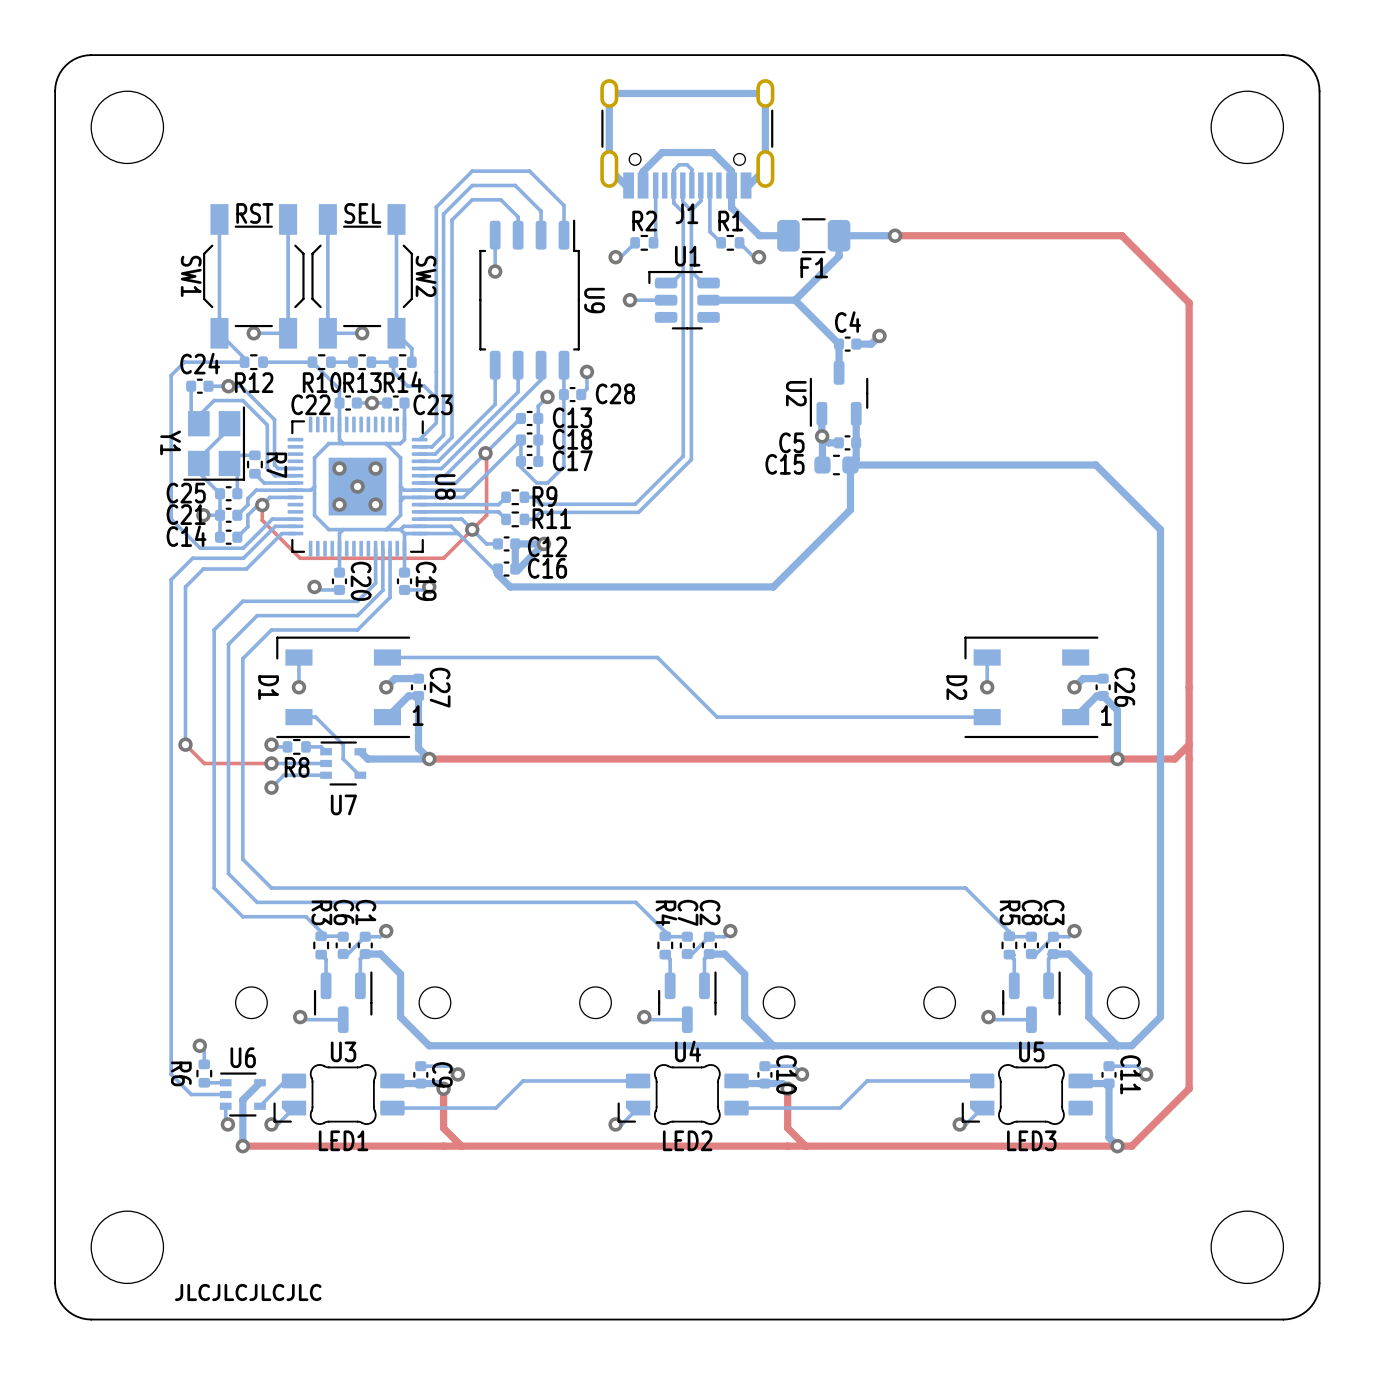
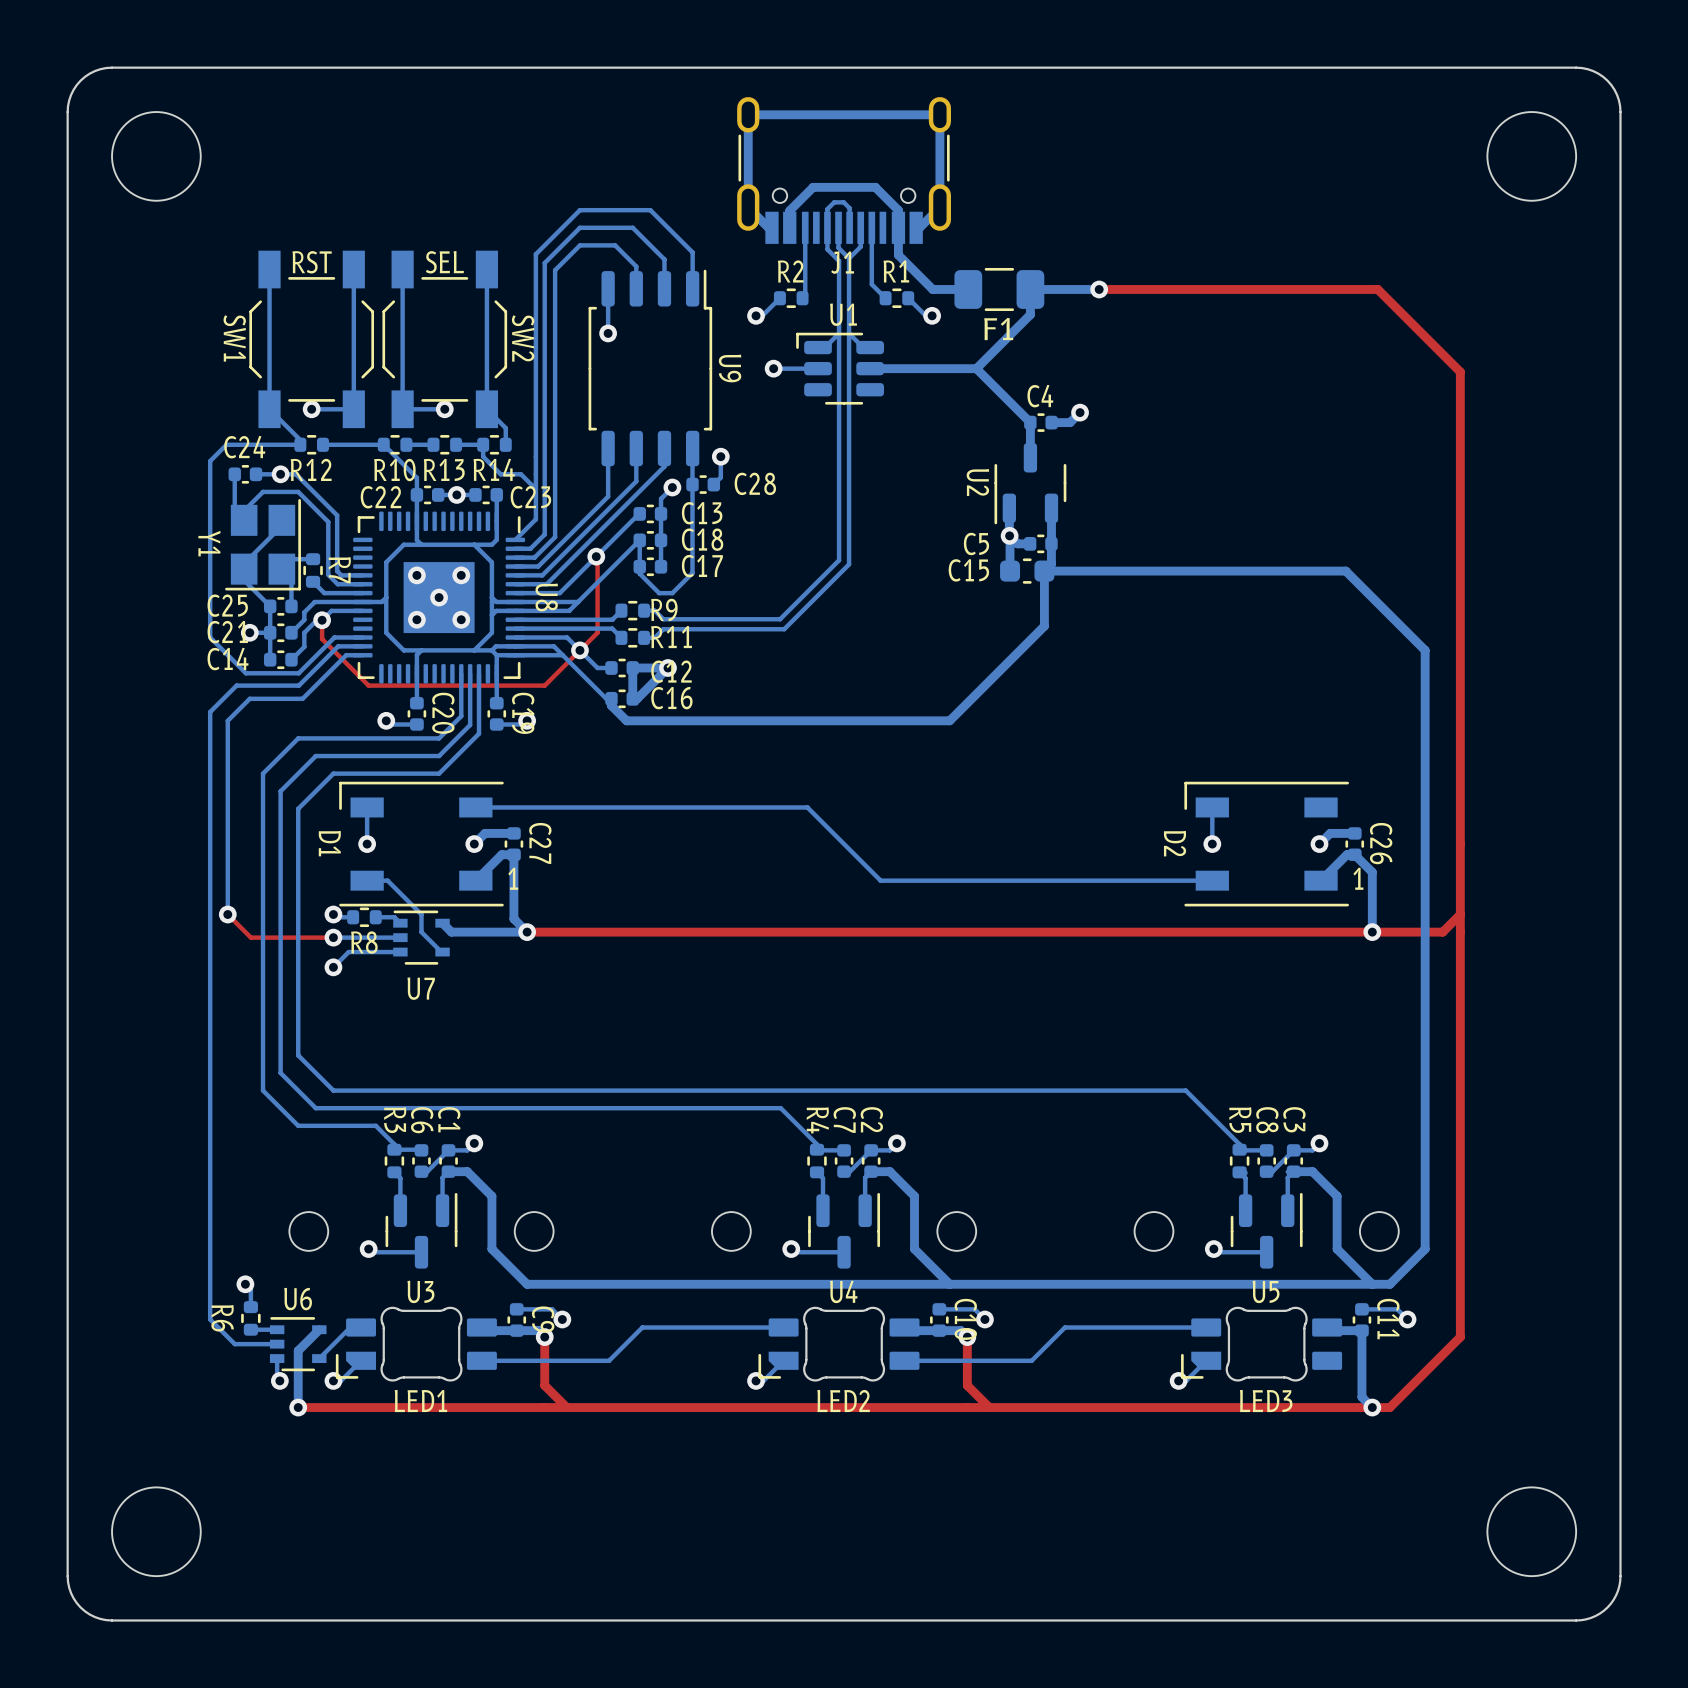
text: JLCJLCJLCJLC (248, 1292) -> none

